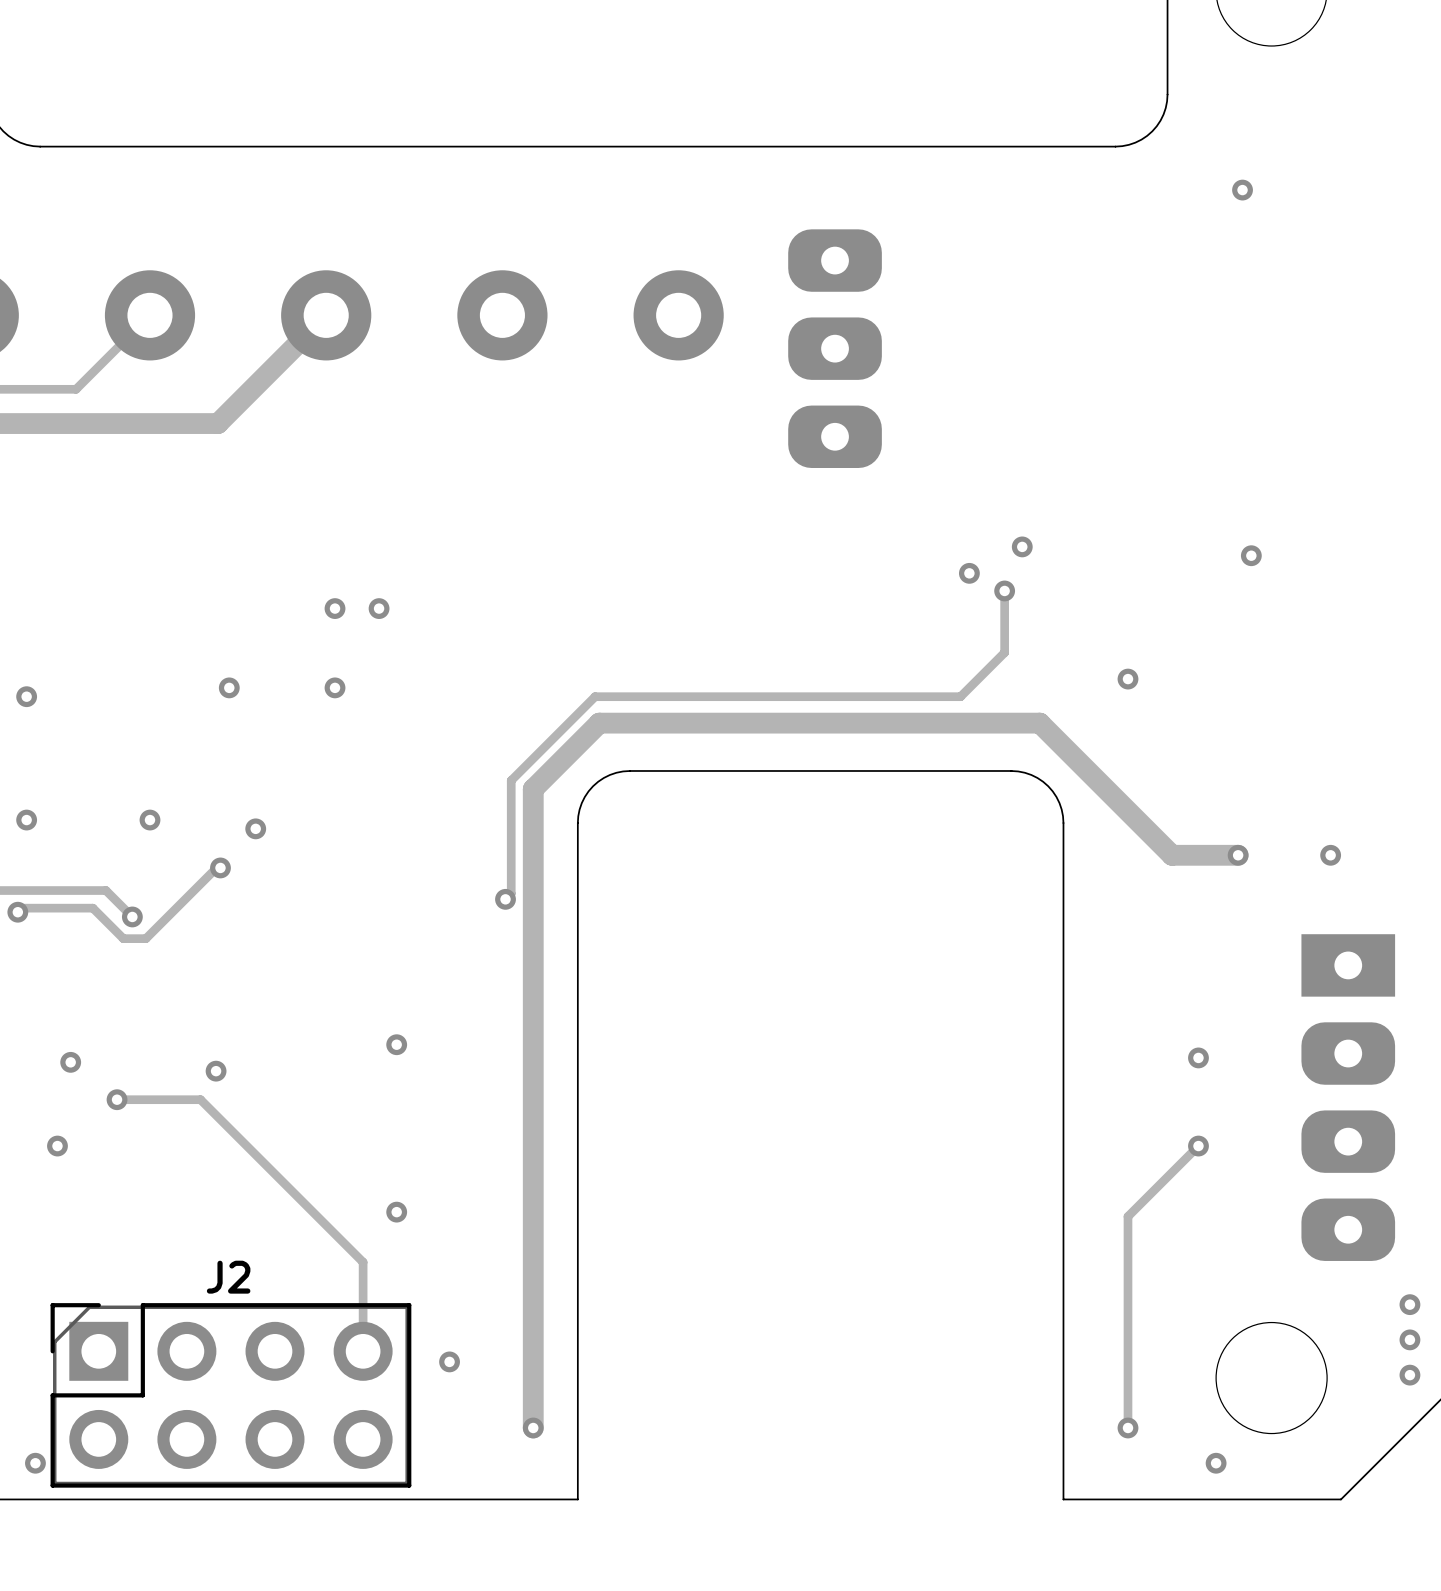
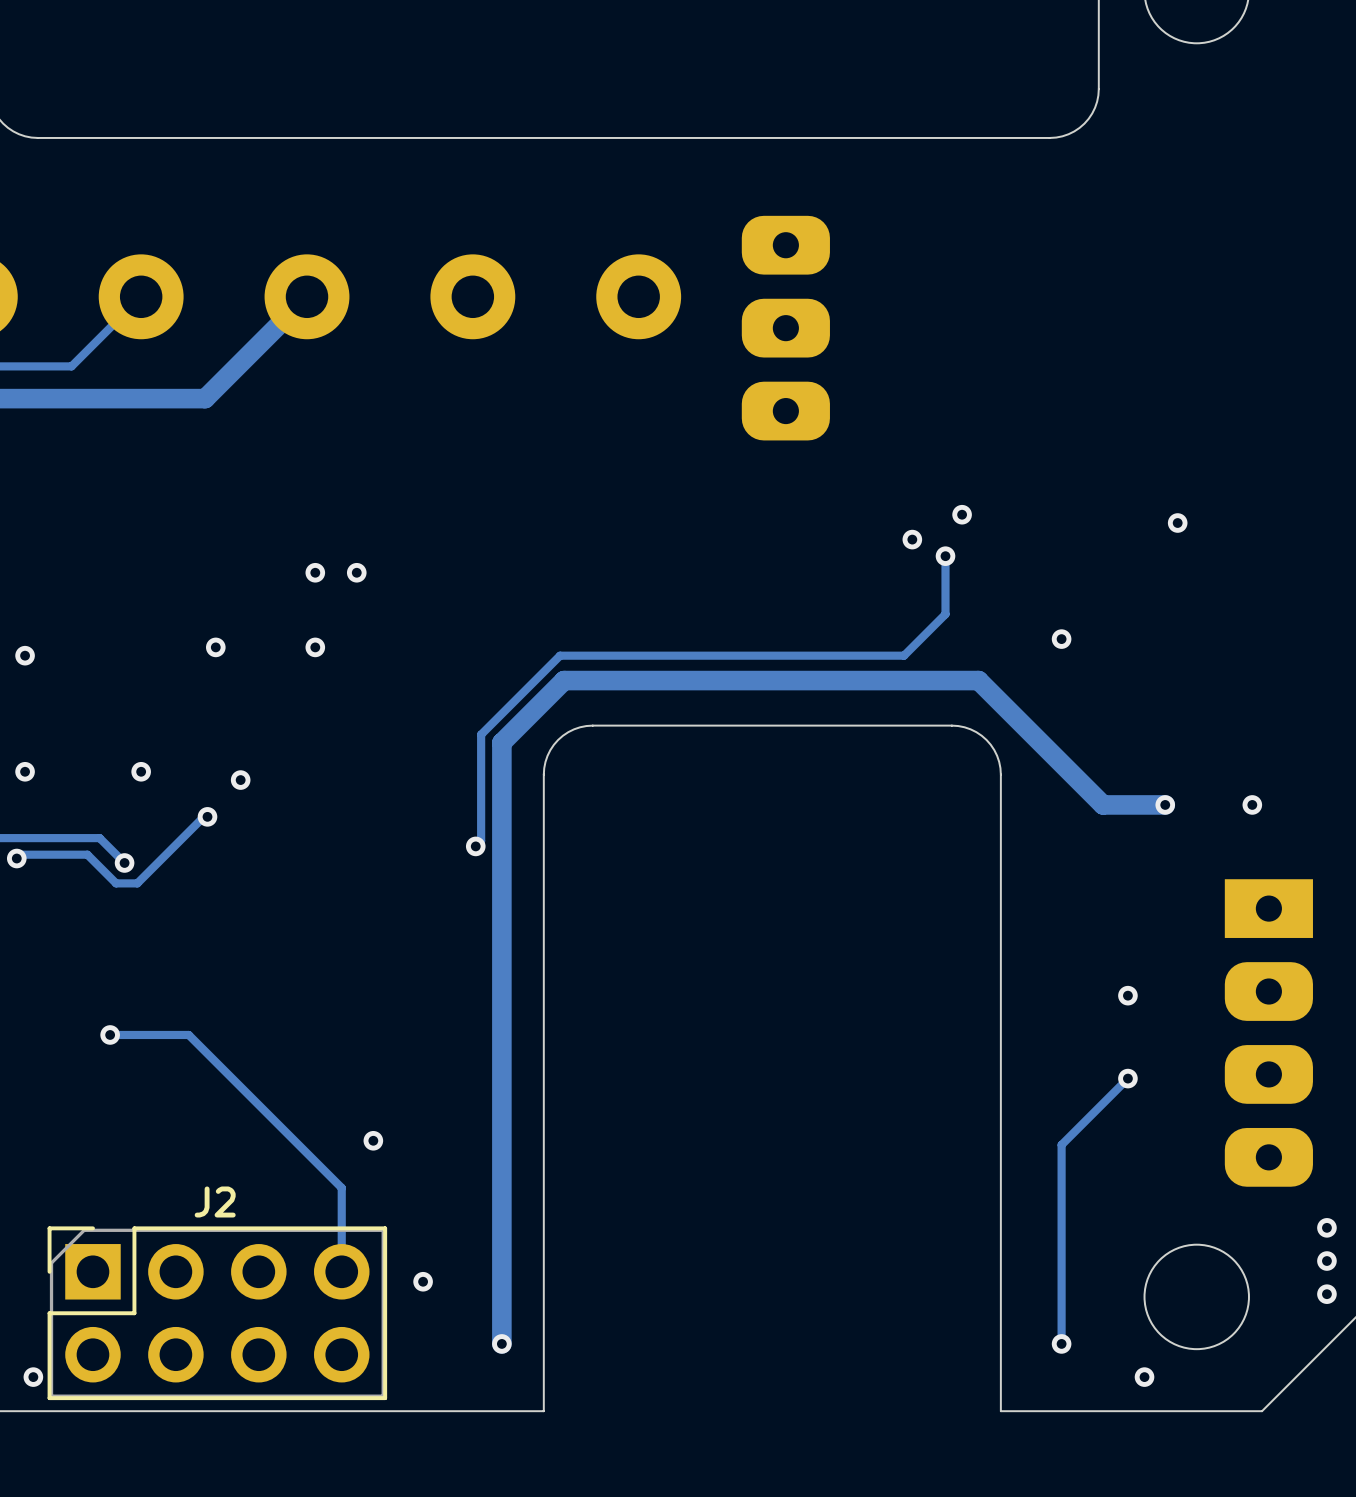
via: (1242, 190) -> none
via: (396, 1044) -> none
via: (70, 1062) -> none
via: (216, 1071) -> none
via: (57, 1146) -> none

